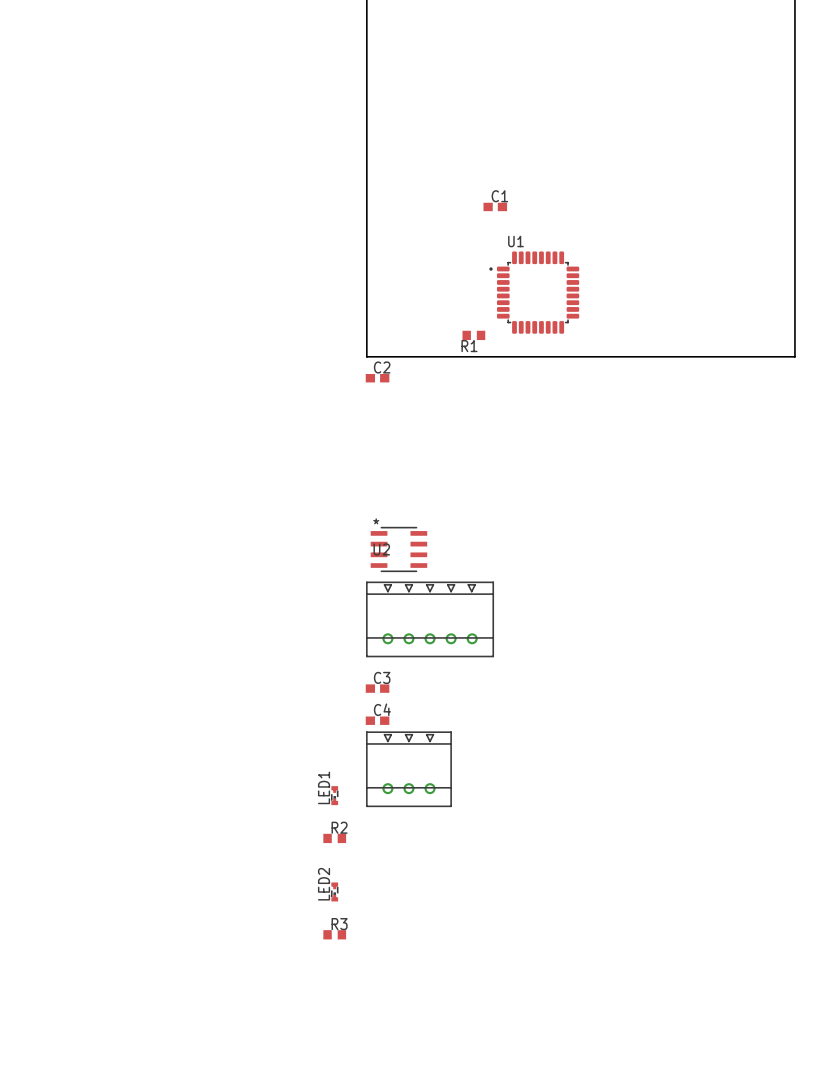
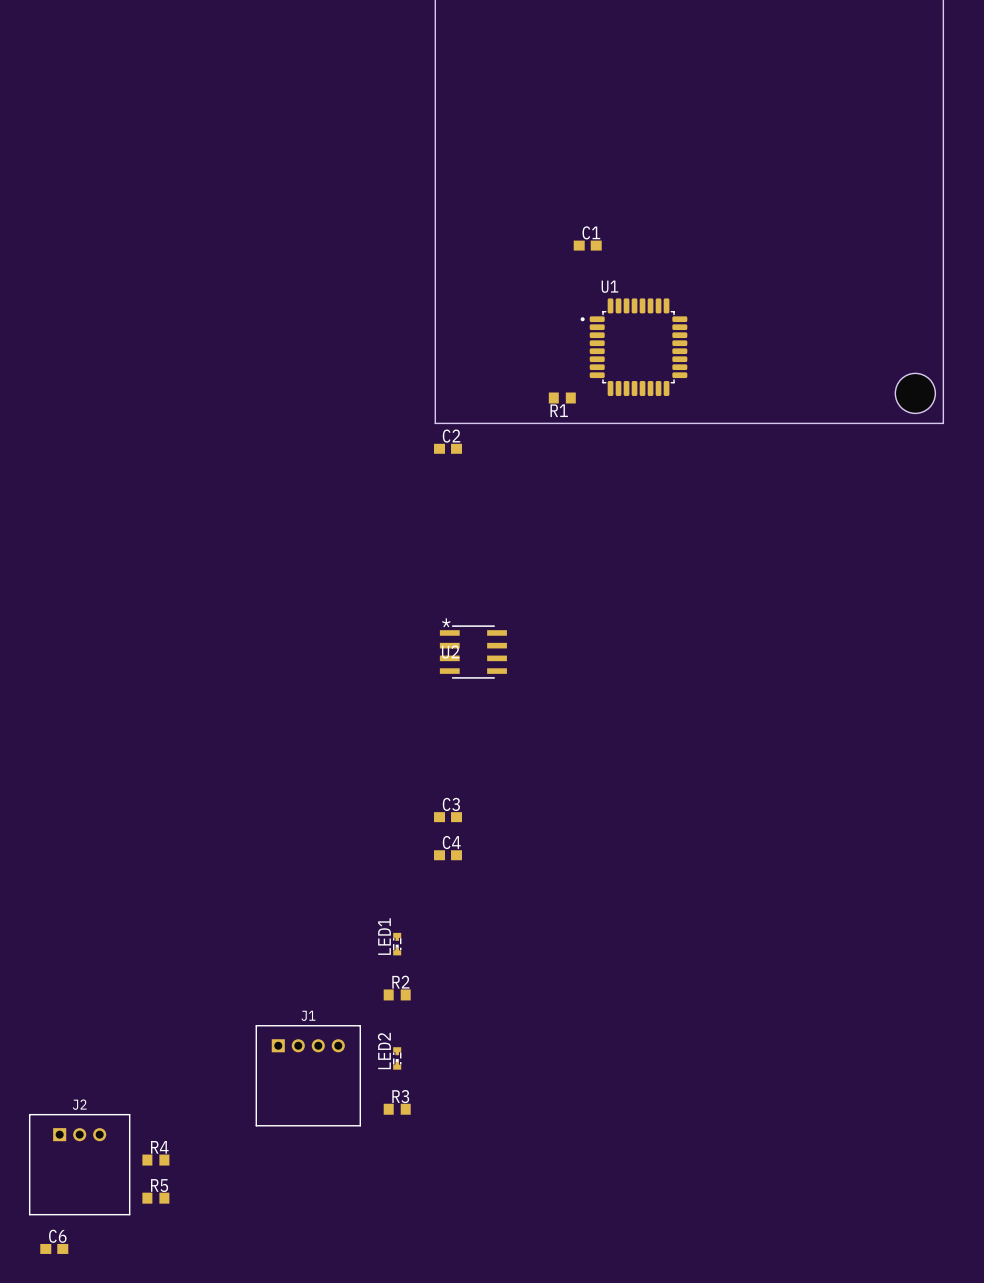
hole: none -> (915, 393)
part: (430, 619) -> none
part: (408, 769) -> none
J1: none -> (308, 1075)
R4: none -> (155, 1160)
J2: none -> (79, 1164)
R5: none -> (155, 1198)
C6: none -> (54, 1248)

